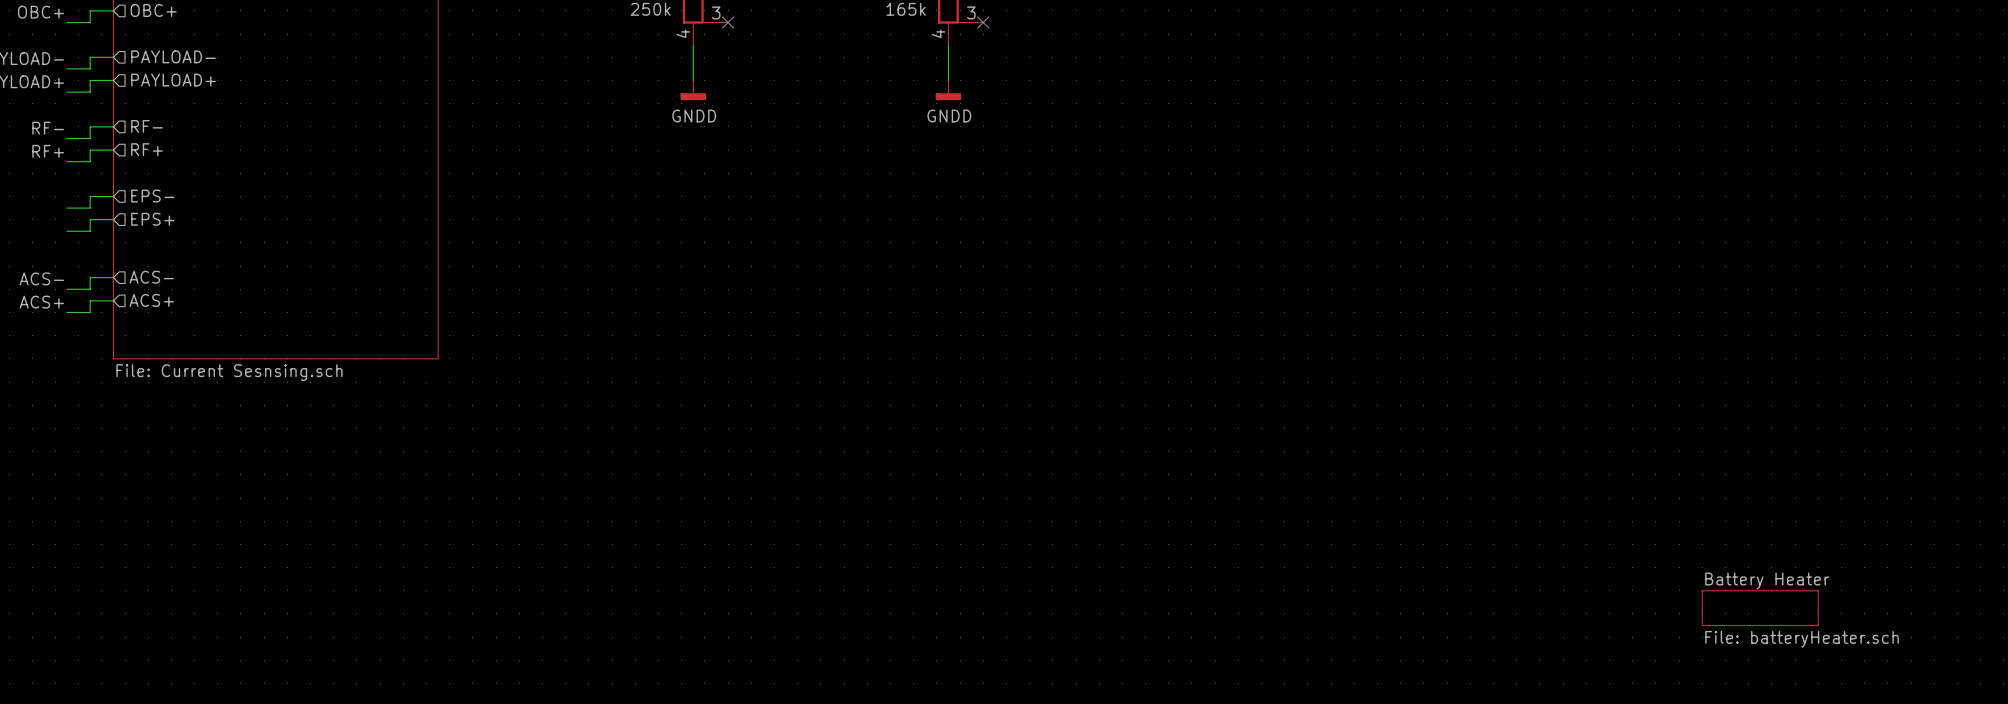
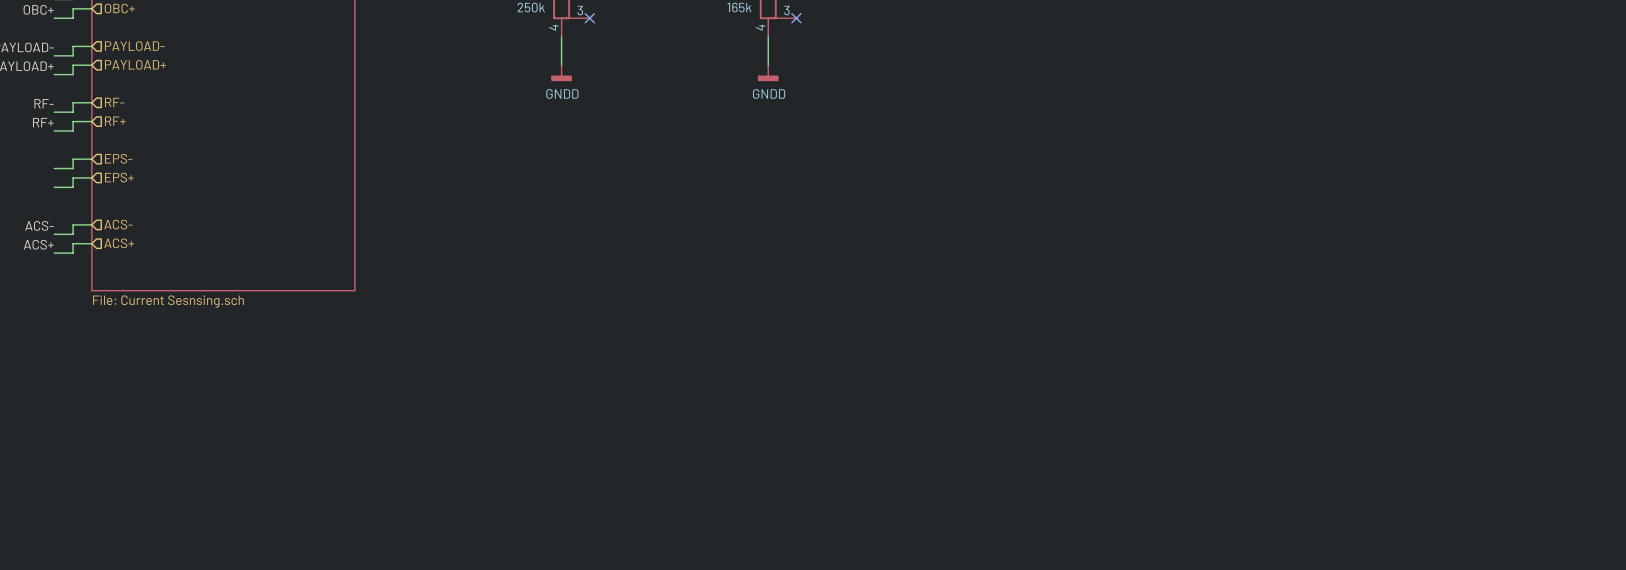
sheet Battery Heater: File: batteryHeater.sch (1760, 608) -> none

